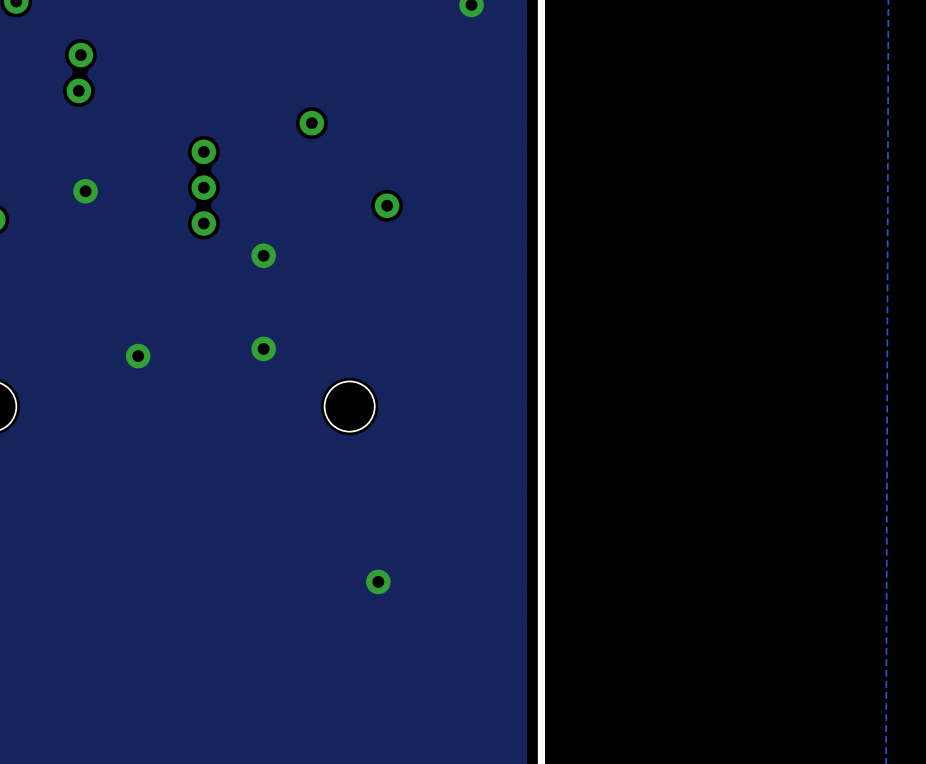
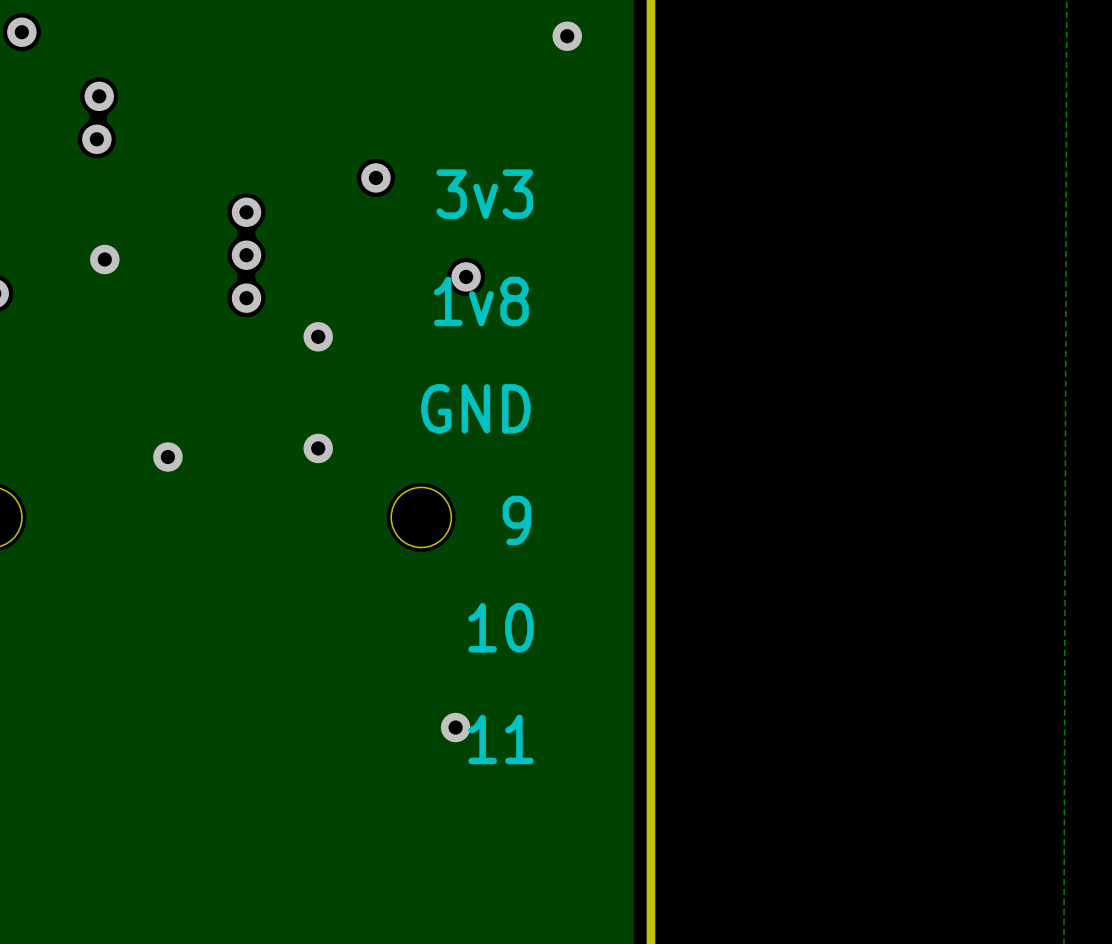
text: none -> 3v3 (484, 194)
text: none -> 1v8 (481, 301)
text: none -> GND (475, 408)
text: none -> 9 (516, 520)
text: none -> 10 (501, 627)
text: none -> 11 (501, 739)

